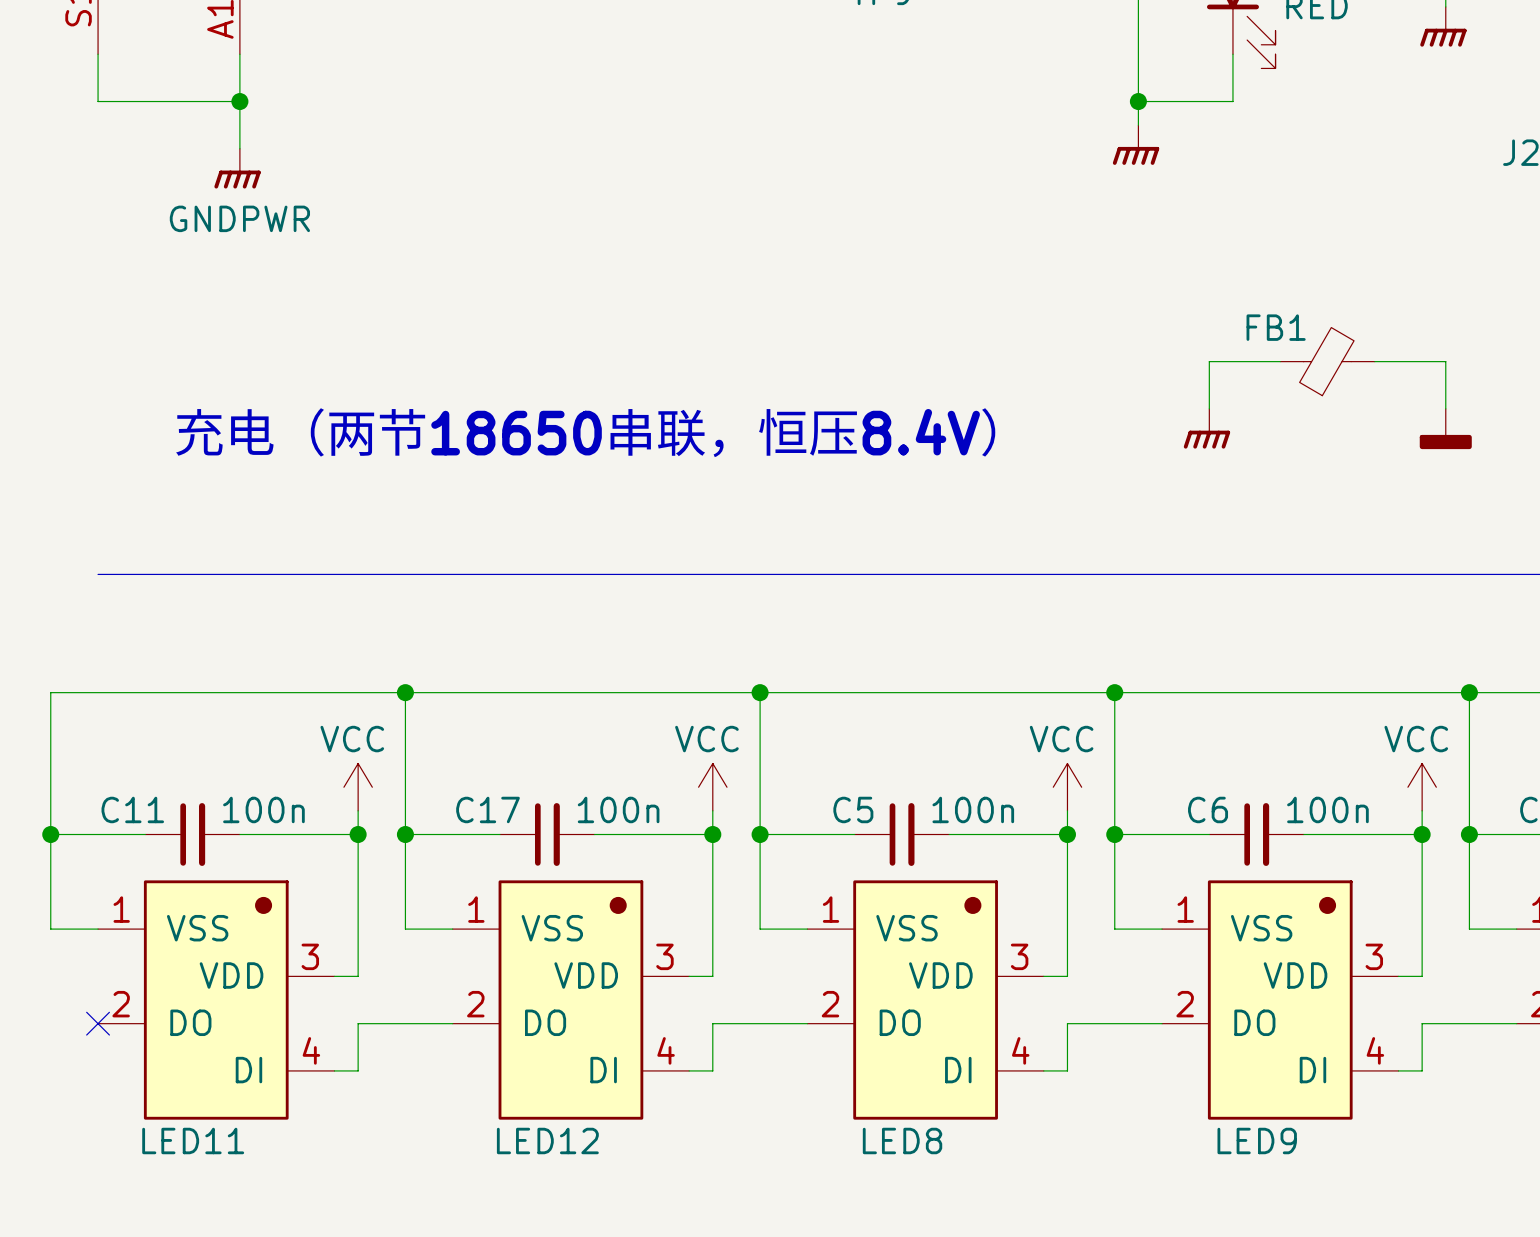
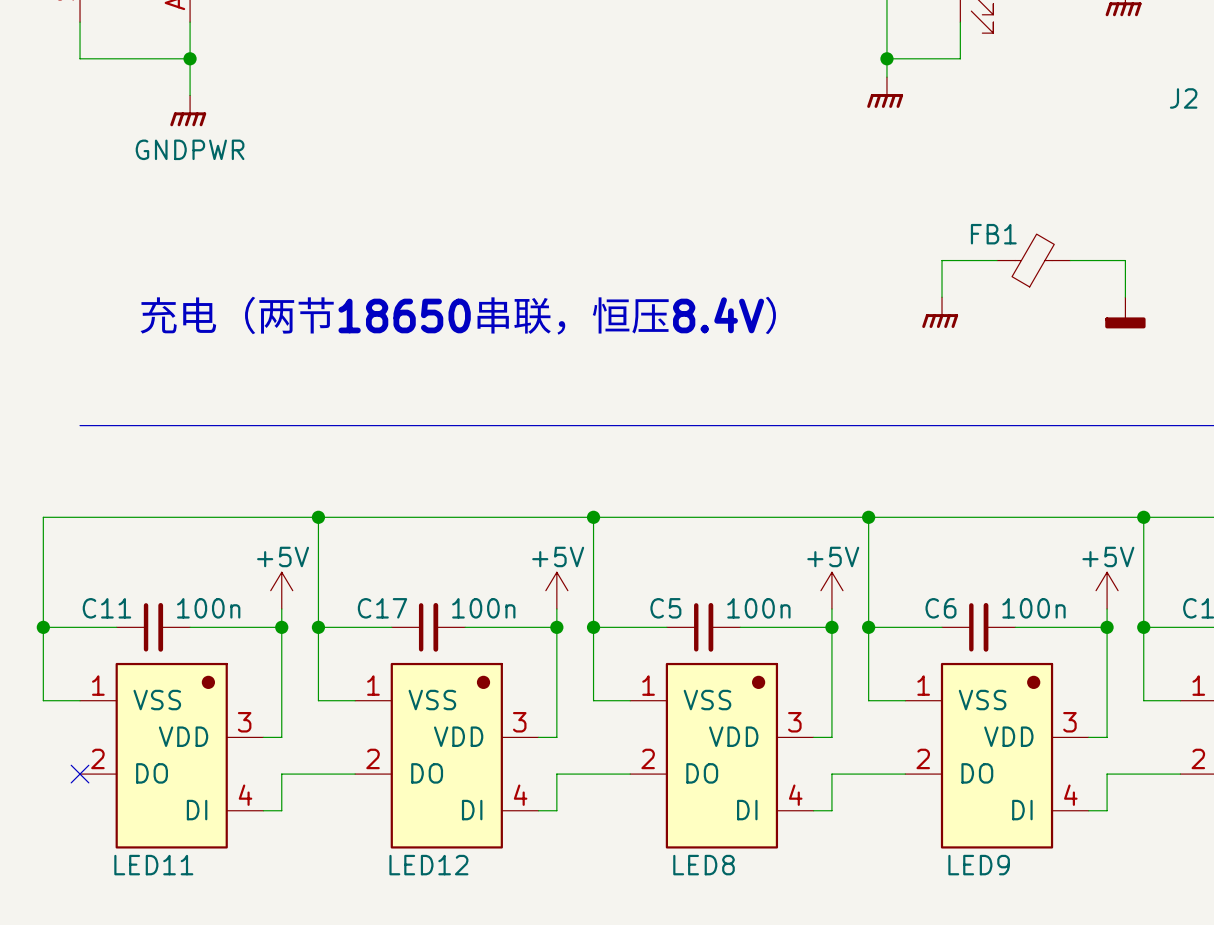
power symbol: VCC (358, 787) -> +5V (281, 590)
power symbol: VCC (712, 787) -> +5V (556, 590)
power symbol: VCC (1067, 787) -> +5V (831, 590)
power symbol: VCC (1422, 787) -> +5V (1107, 590)

